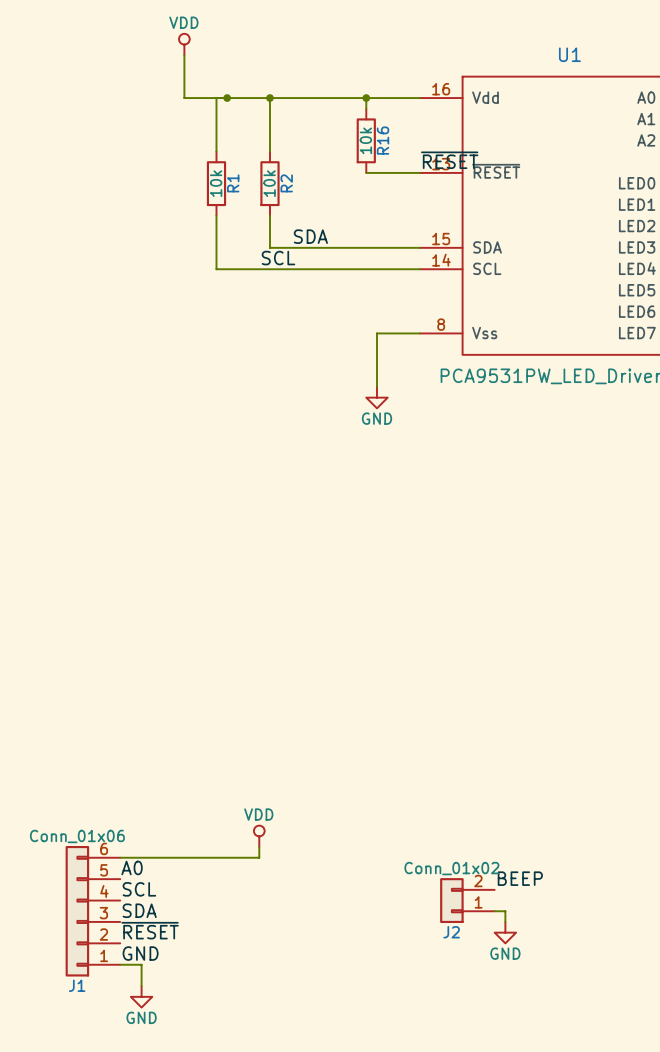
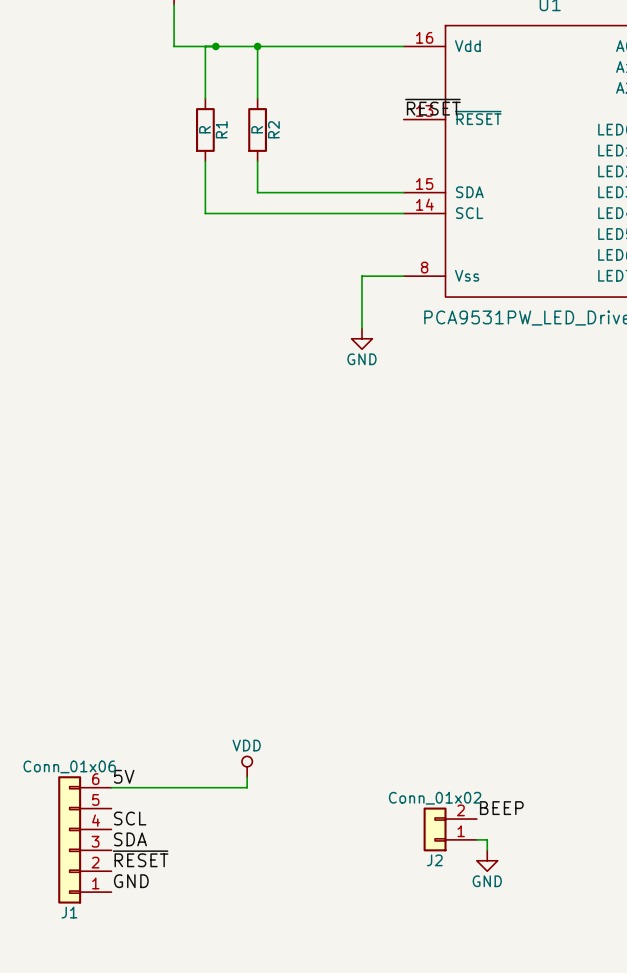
wire: (366, 98) (366, 108) -> none
junction: (366, 98) -> none
R16: 10k (366, 140) -> none
wire: (366, 172) (419, 172) -> none
R1 value: 10k (216, 183) -> R (205, 129)
R2 value: 10k (269, 183) -> R (257, 129)
label: SDA (310, 236) -> none
label: SCL (278, 258) -> none
label: none -> 5V (124, 776)
label: A0 (132, 867) -> none
wire: (120, 964) (141, 964) (141, 986) -> none
power symbol: GND (141, 996) -> none

